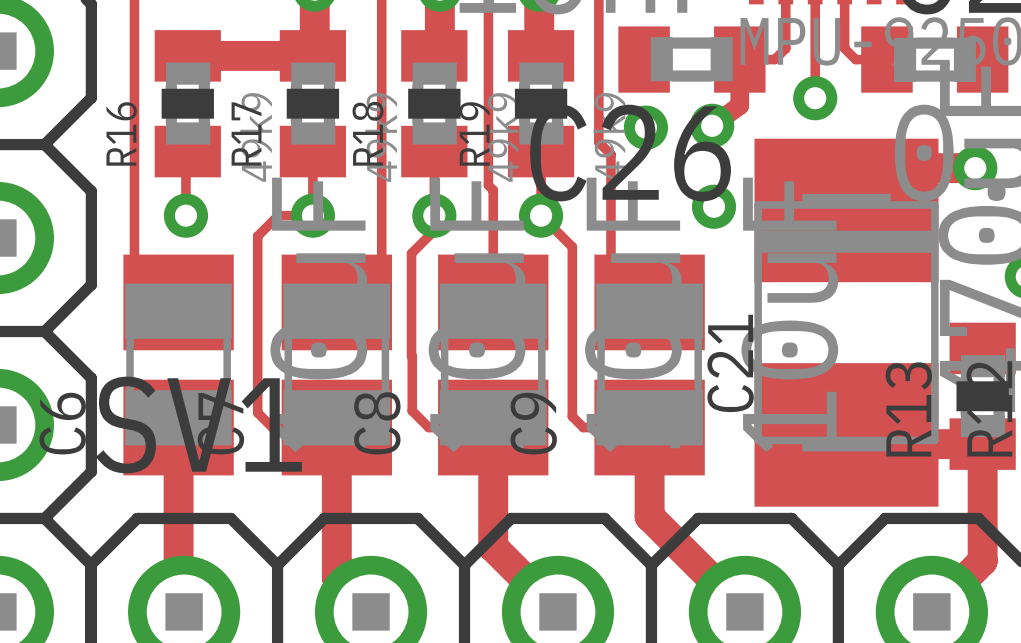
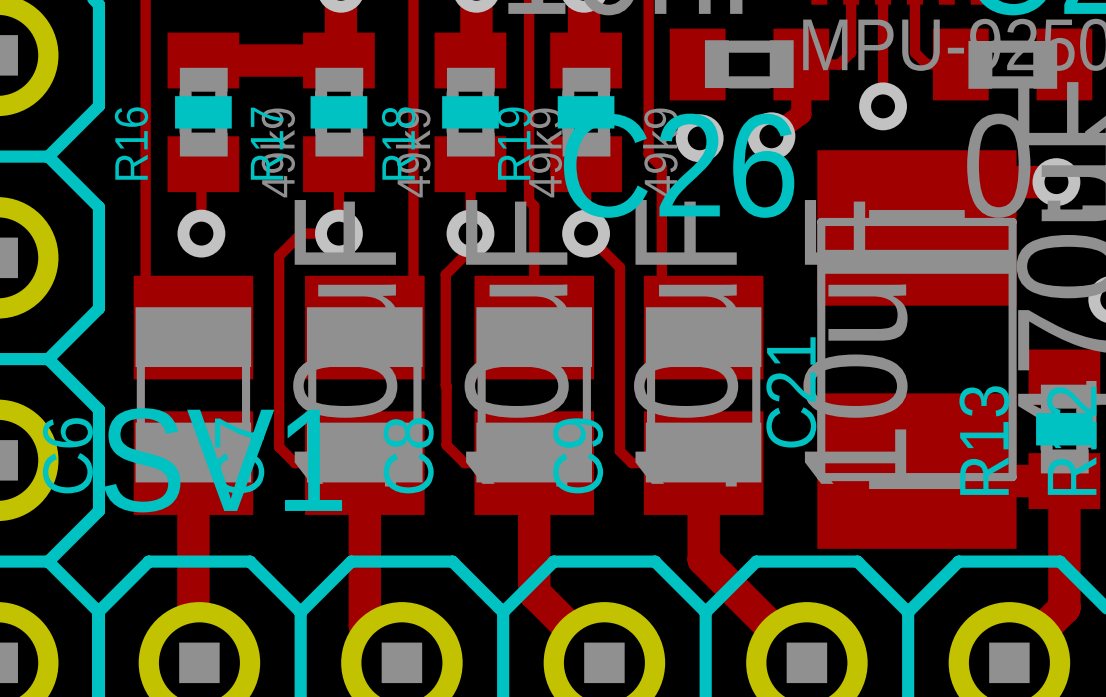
via: (714, 206) -> none

